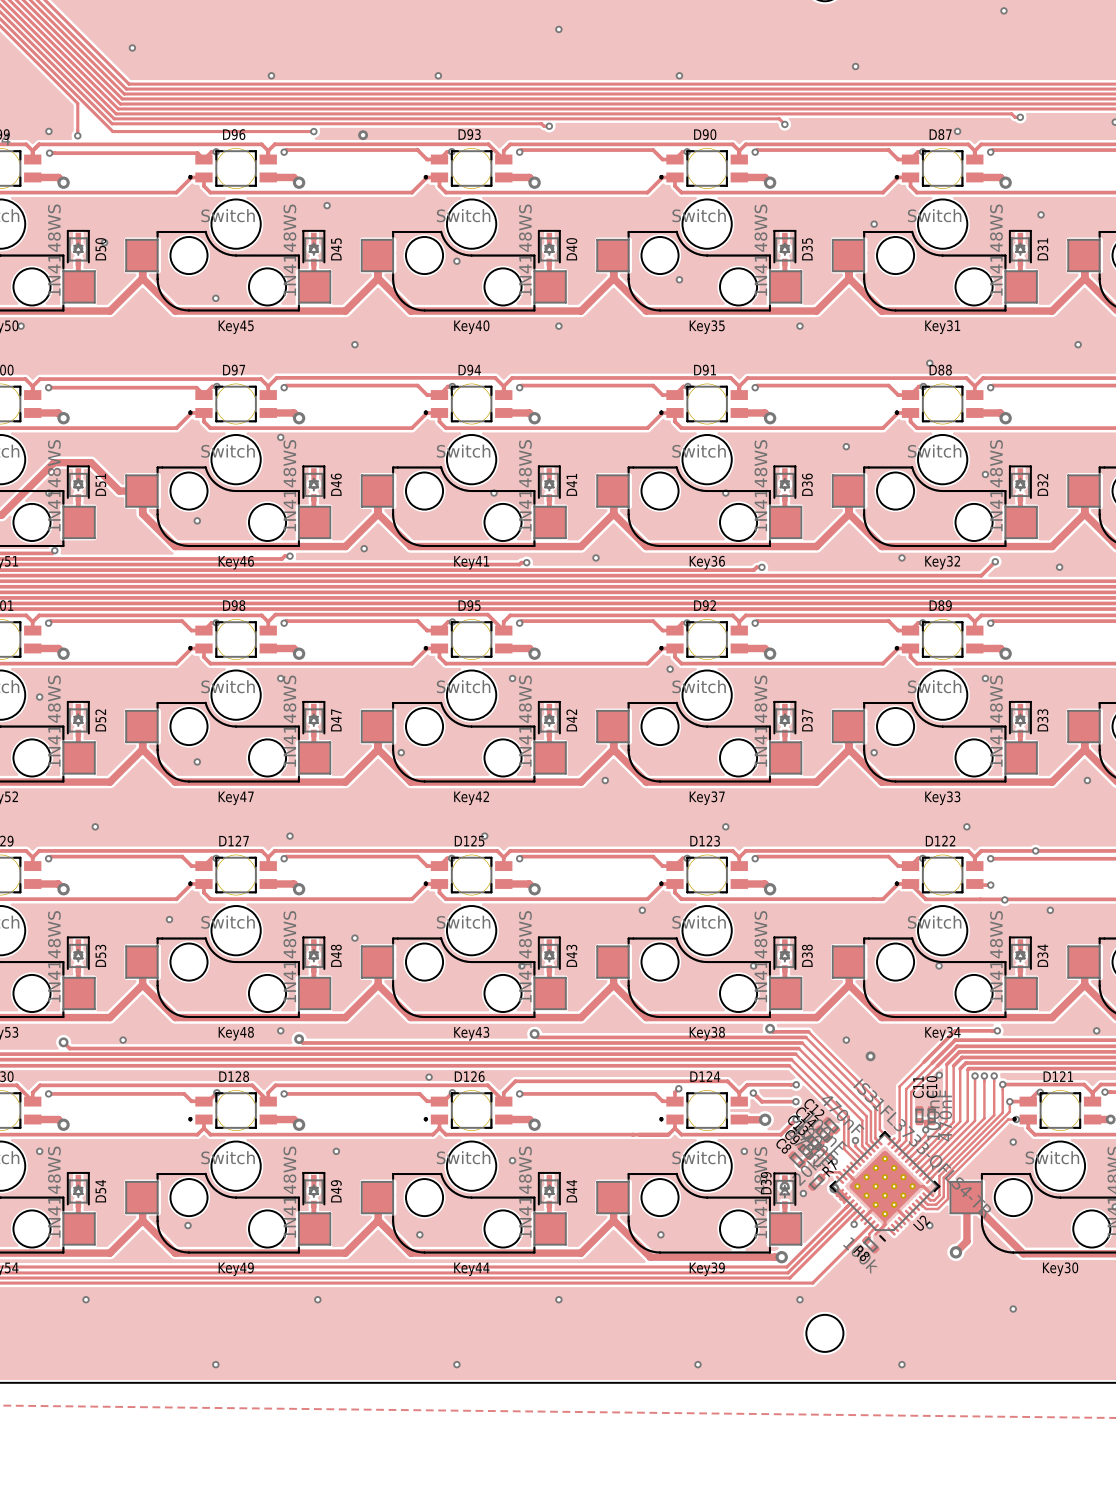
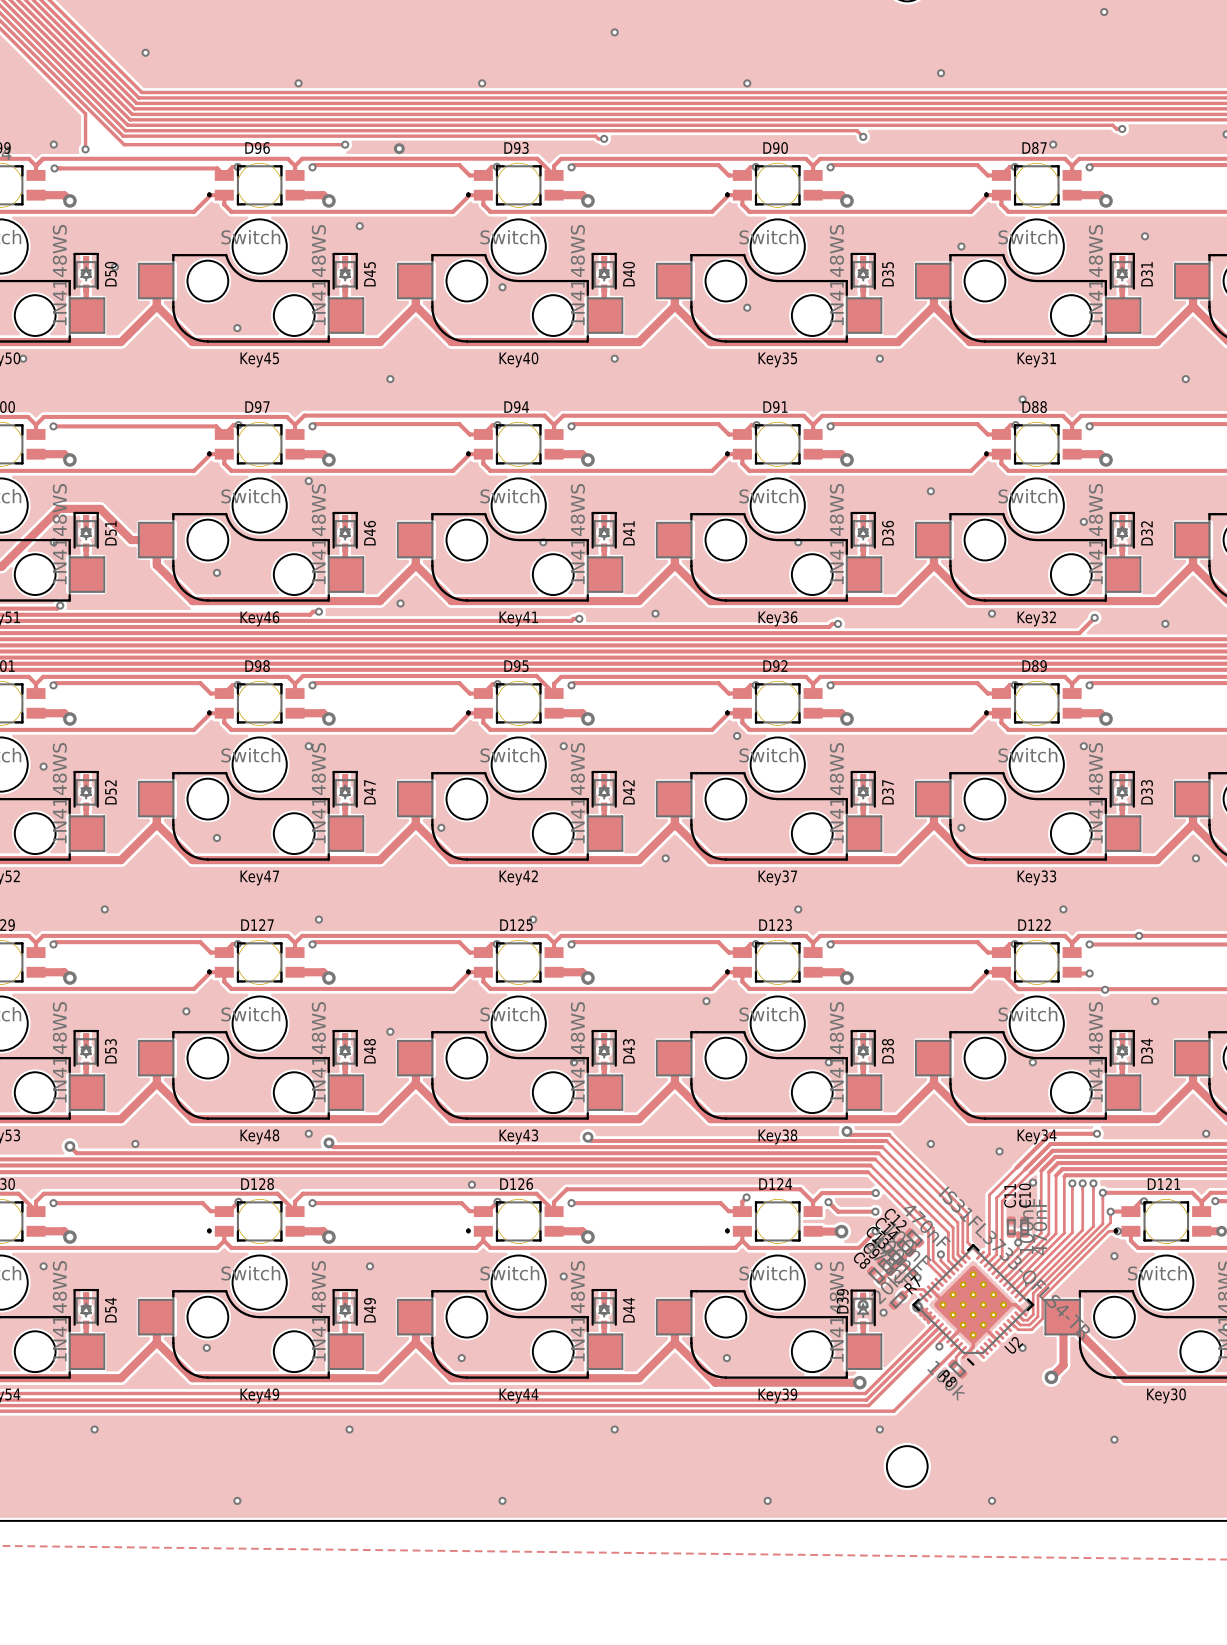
via: none -> (999, 1151)
via: (870, 1056) -> none

